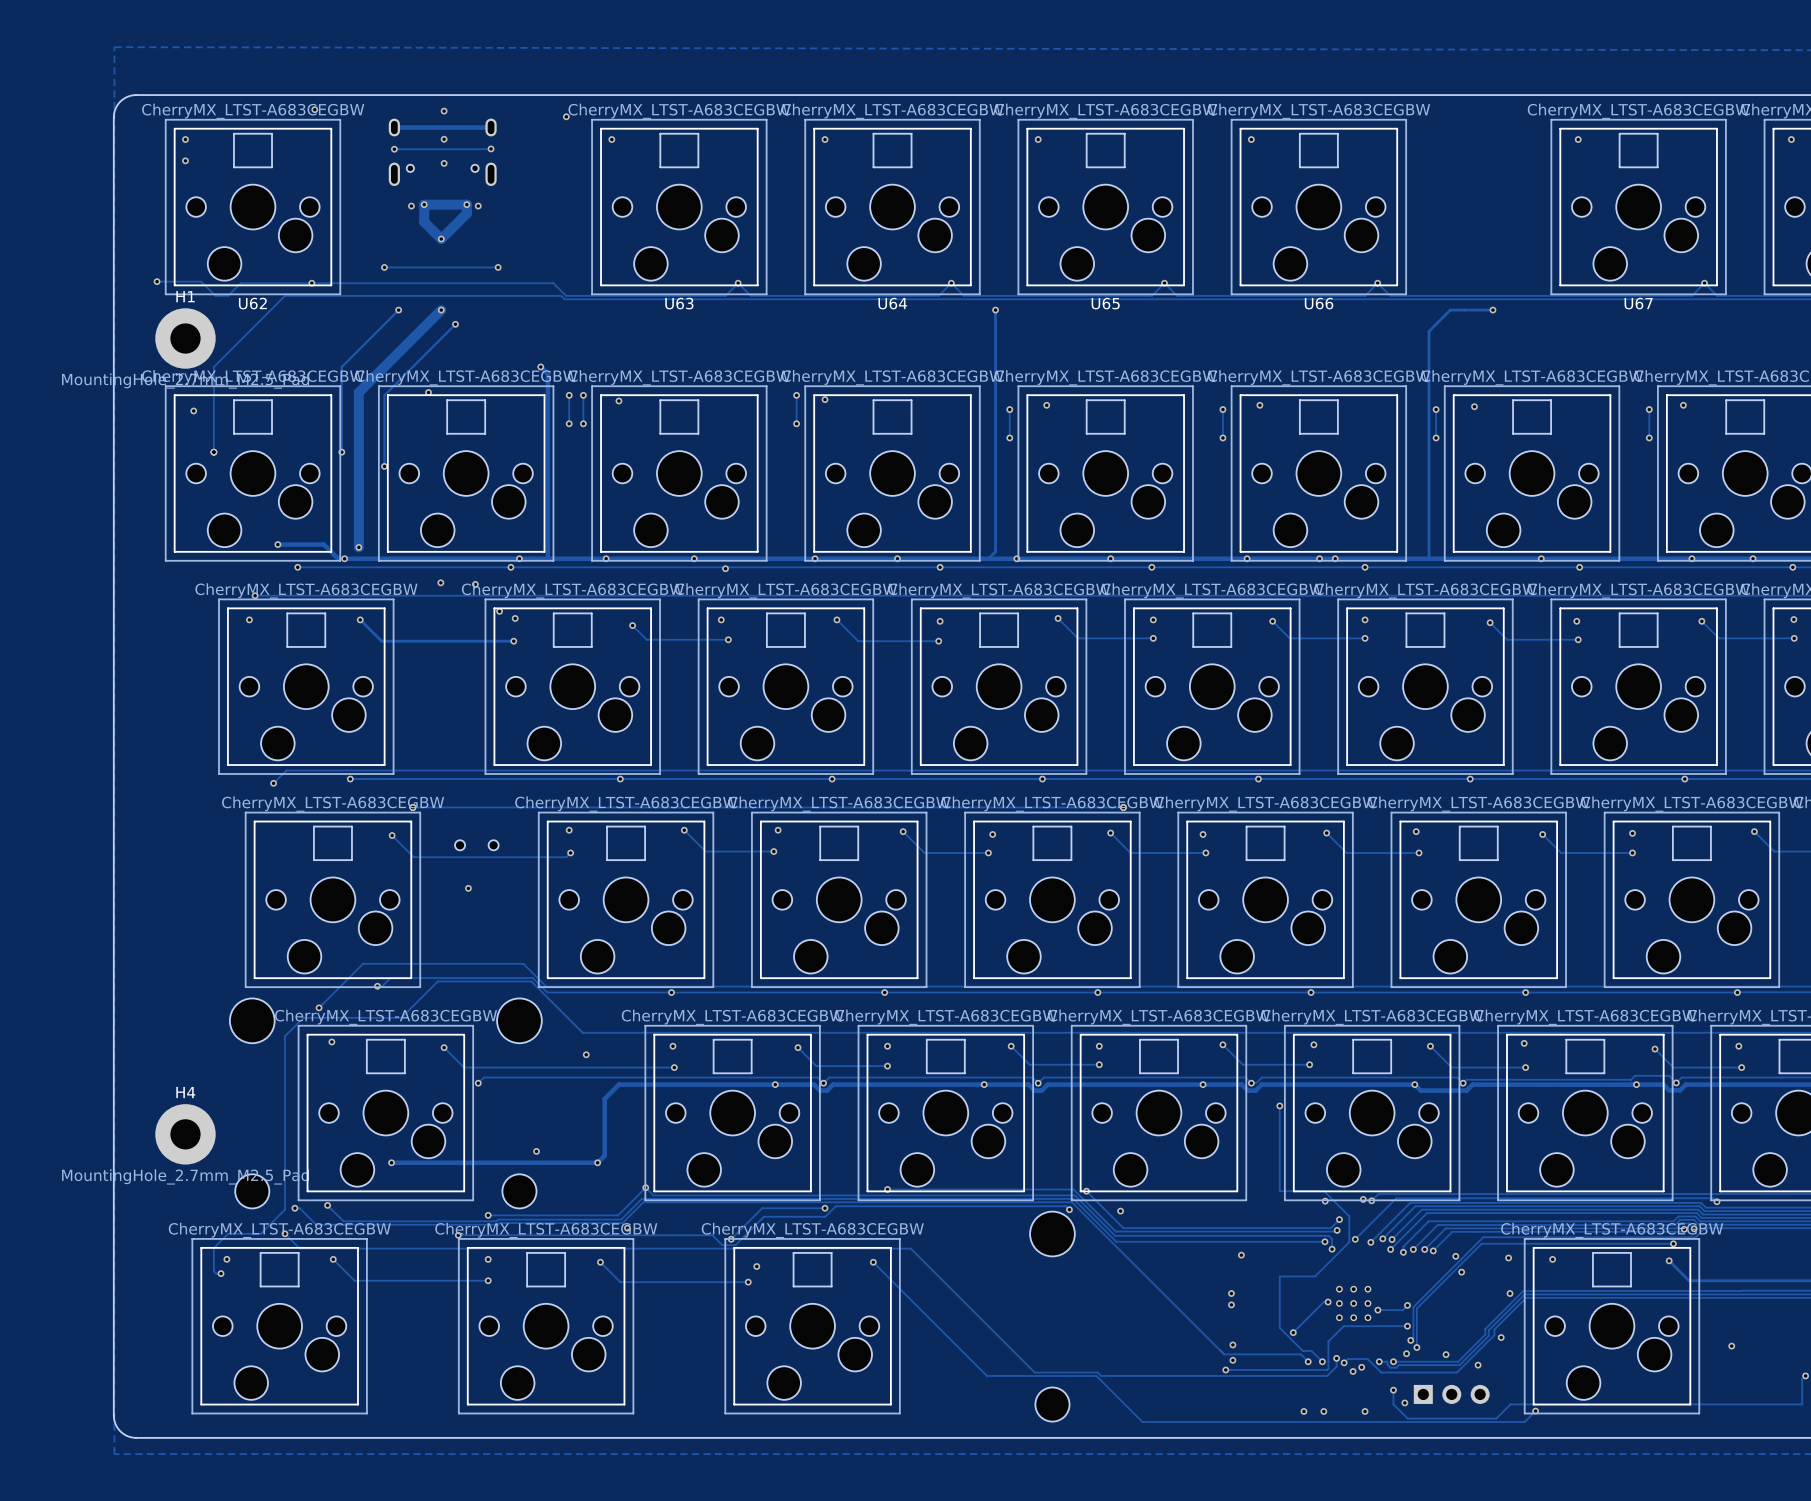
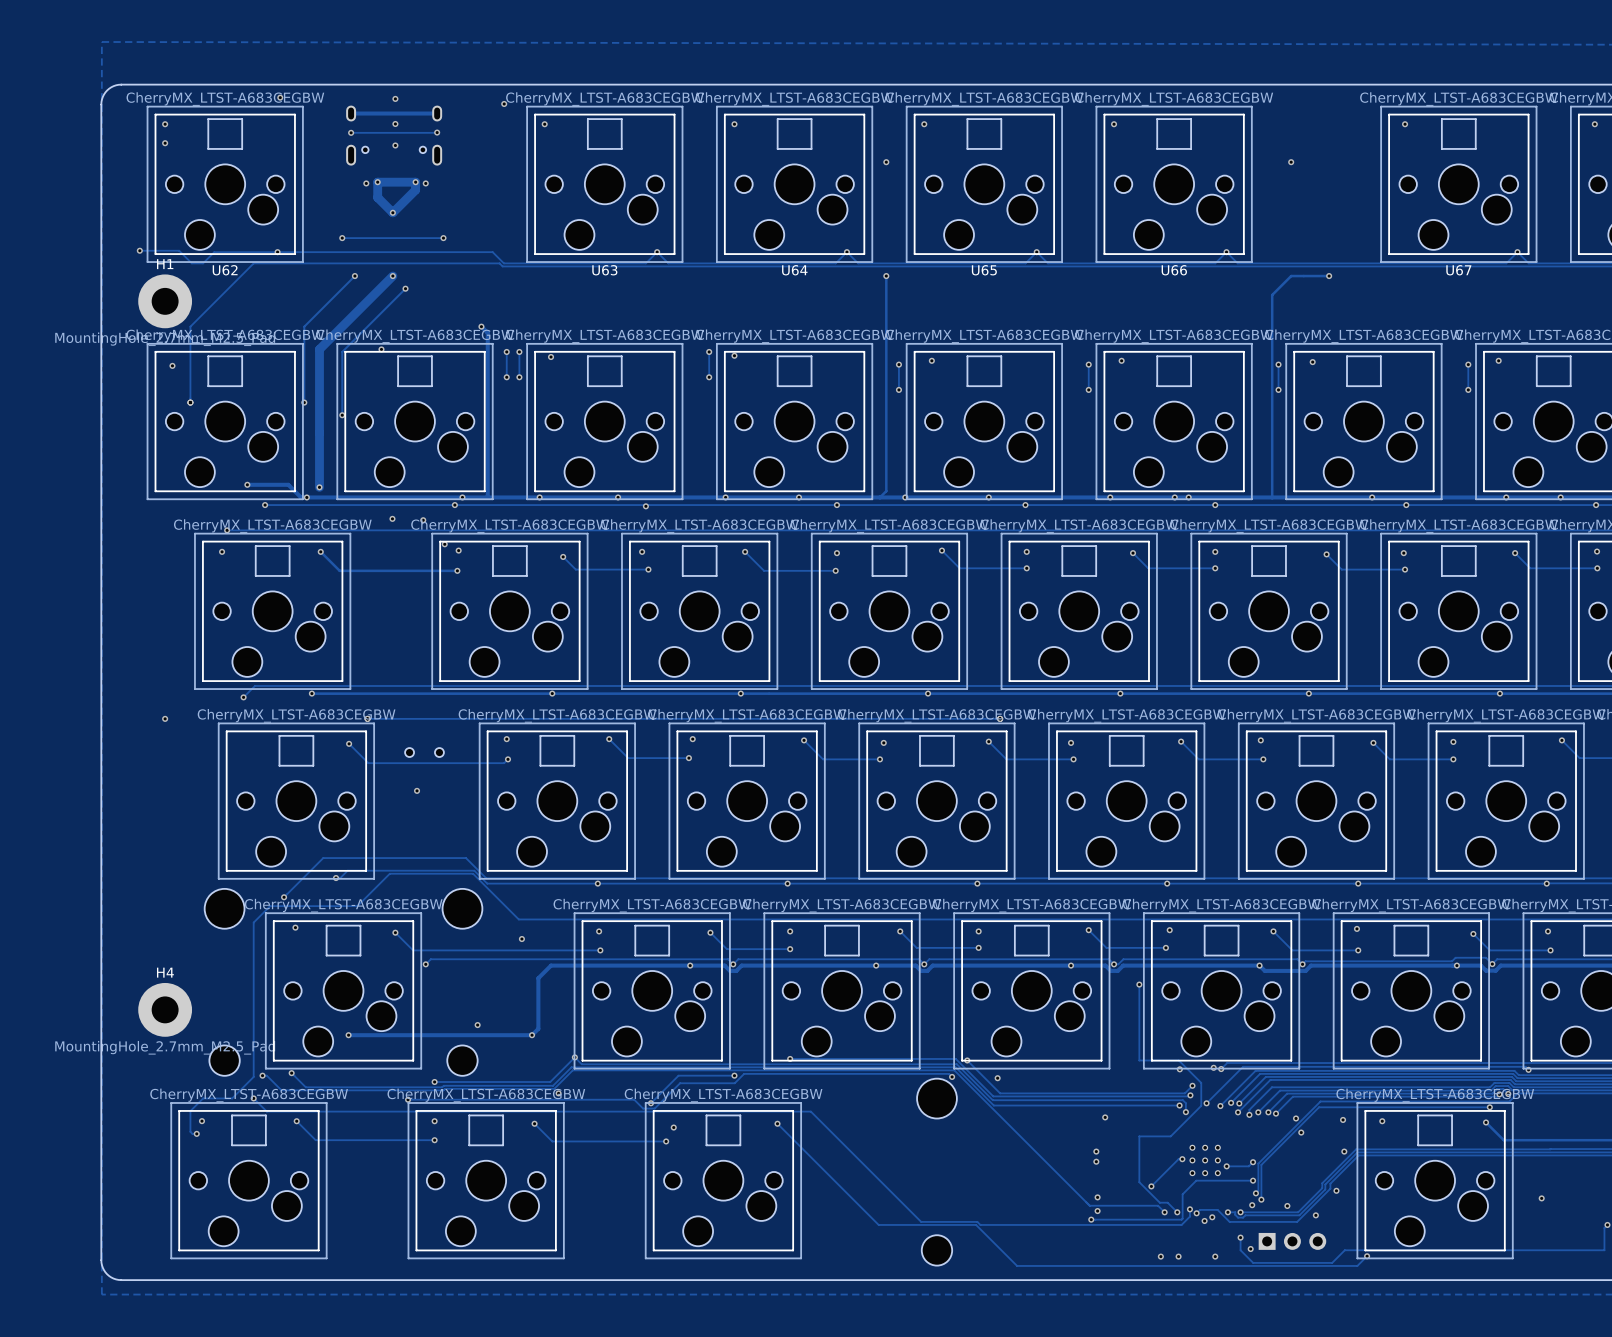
via: none -> (886, 162)
via: none -> (1291, 162)
via: none -> (165, 718)

